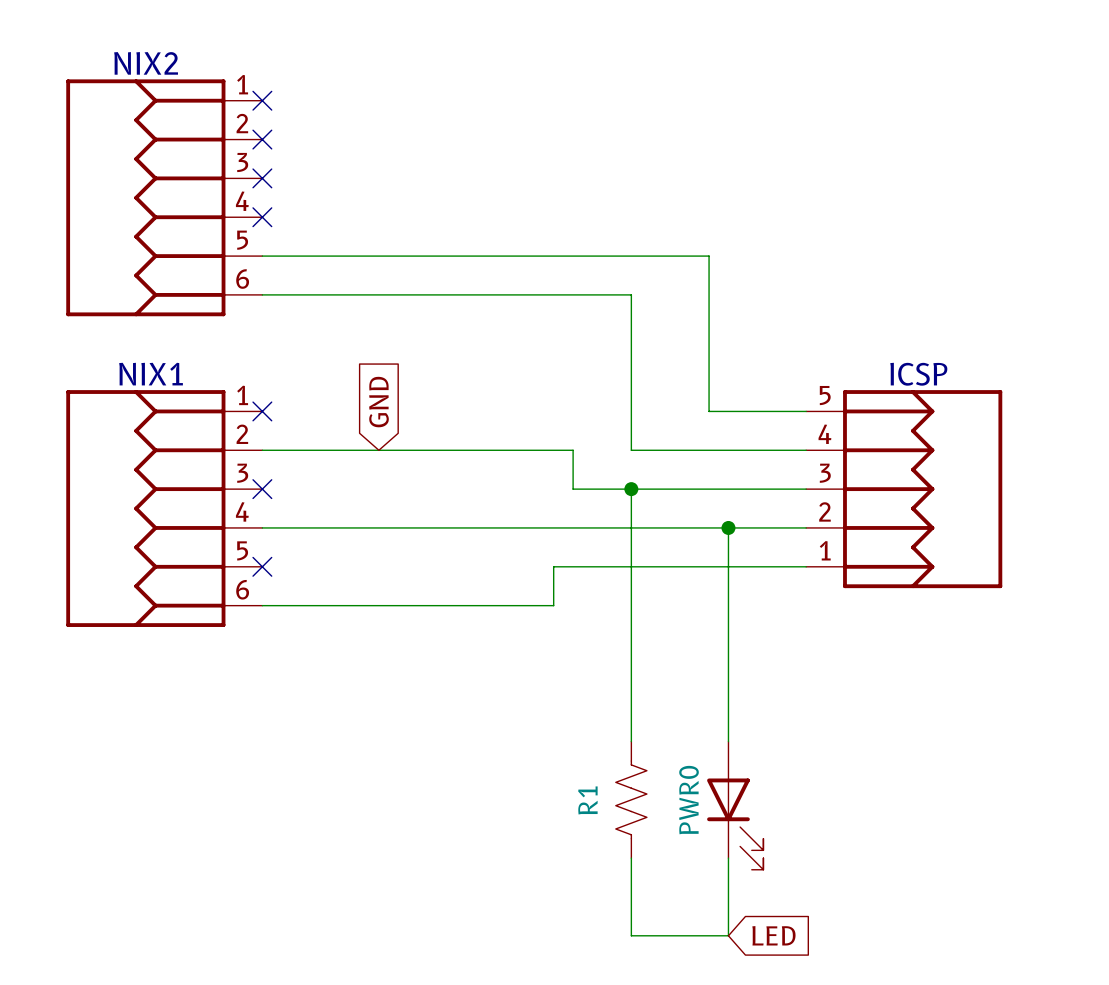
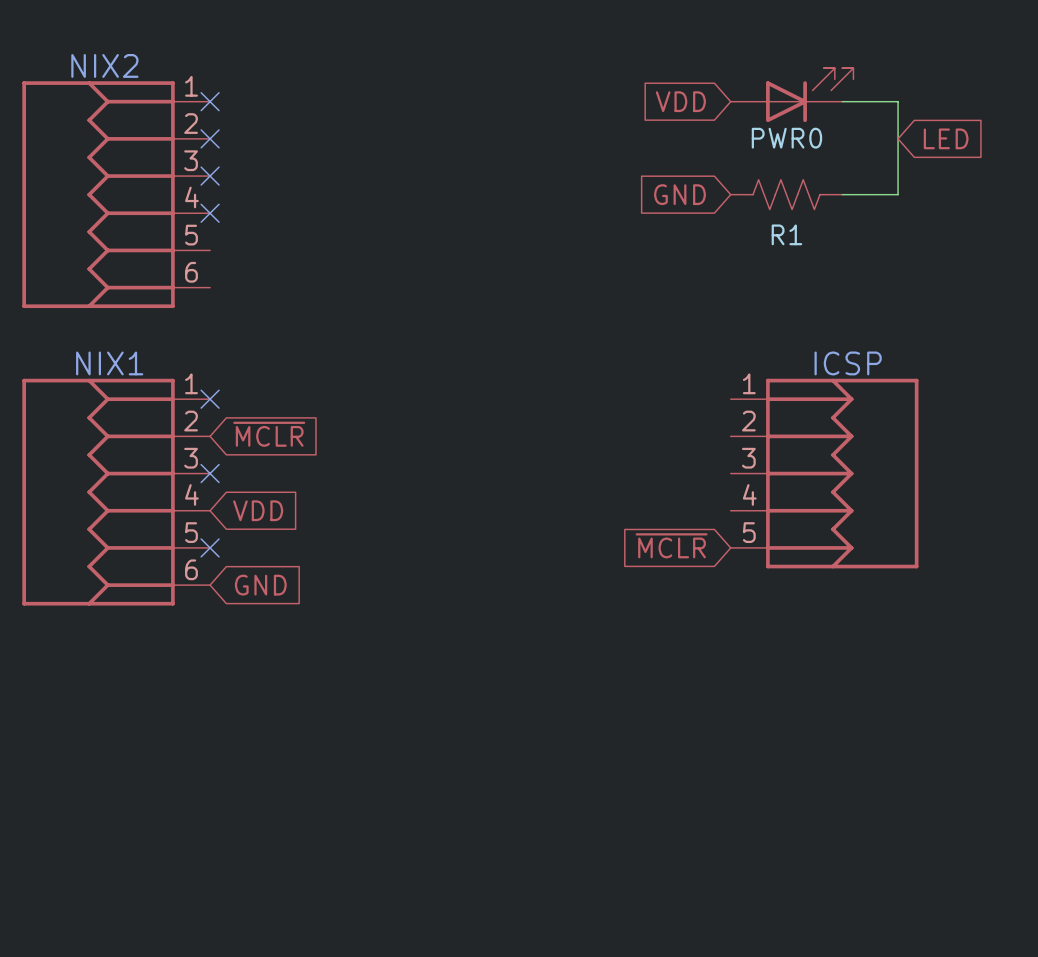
global label: none -> VDD (680, 101)
wire: none -> (842, 101) (898, 101) (898, 194) (842, 194)
global label: none -> LED (946, 138)
global label: none -> GND (679, 194)
wire: (262, 256) (709, 256) (709, 411) (806, 411) -> none
wire: (262, 294) (631, 294) (631, 450) (806, 450) -> none
global label rotation: 0° (379, 402) -> 90° clockwise (260, 585)
global label position: GND (379, 402) -> GND (260, 585)
global label: none -> ~{MCLR} (269, 434)
wire: (262, 450) (573, 450) (573, 489) (806, 489) -> none
wire: (631, 489) (631, 741) -> none
junction: (631, 489) -> none
part flip: as is (922, 489) -> up-down (842, 473)
wire: (262, 527) (806, 527) -> none
wire: (728, 527) (728, 741) -> none
junction: (728, 527) -> none
global label: none -> VDD (258, 510)
global label: none -> ~{MCLR} (671, 545)
wire: (806, 566) (553, 566) (553, 605) (262, 605) -> none
R1 rotation: 0° (631, 799) -> 90° clockwise (786, 194)
R1 position: (631, 799) -> (786, 194)
R1 name position: R1 (587, 800) -> R1 (786, 234)
PWR0 position: (735, 805) -> (792, 95)
PWR0 rotation: 0° (735, 824) -> 90° counterclockwise (809, 95)
wire: (631, 858) (631, 935) (728, 935) (728, 858) -> none
global label: LED (773, 935) -> none

